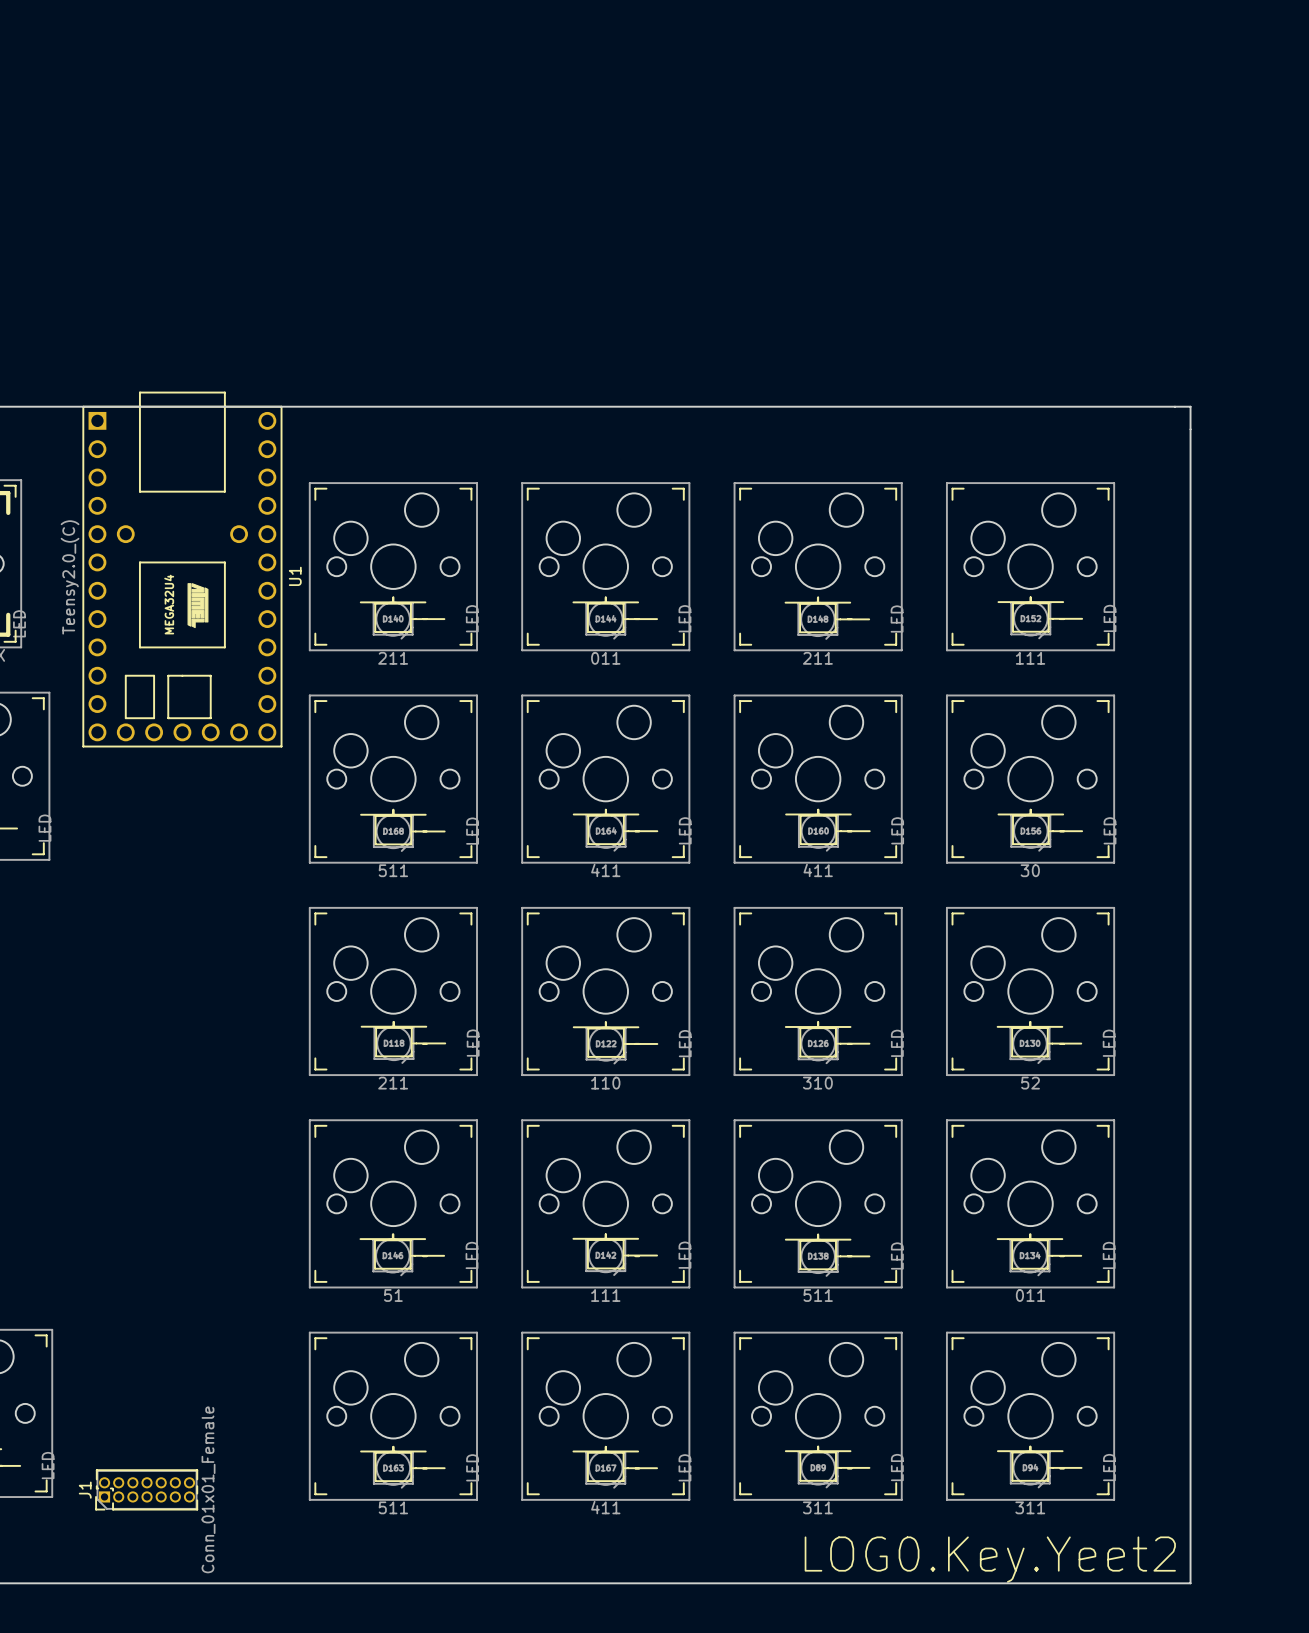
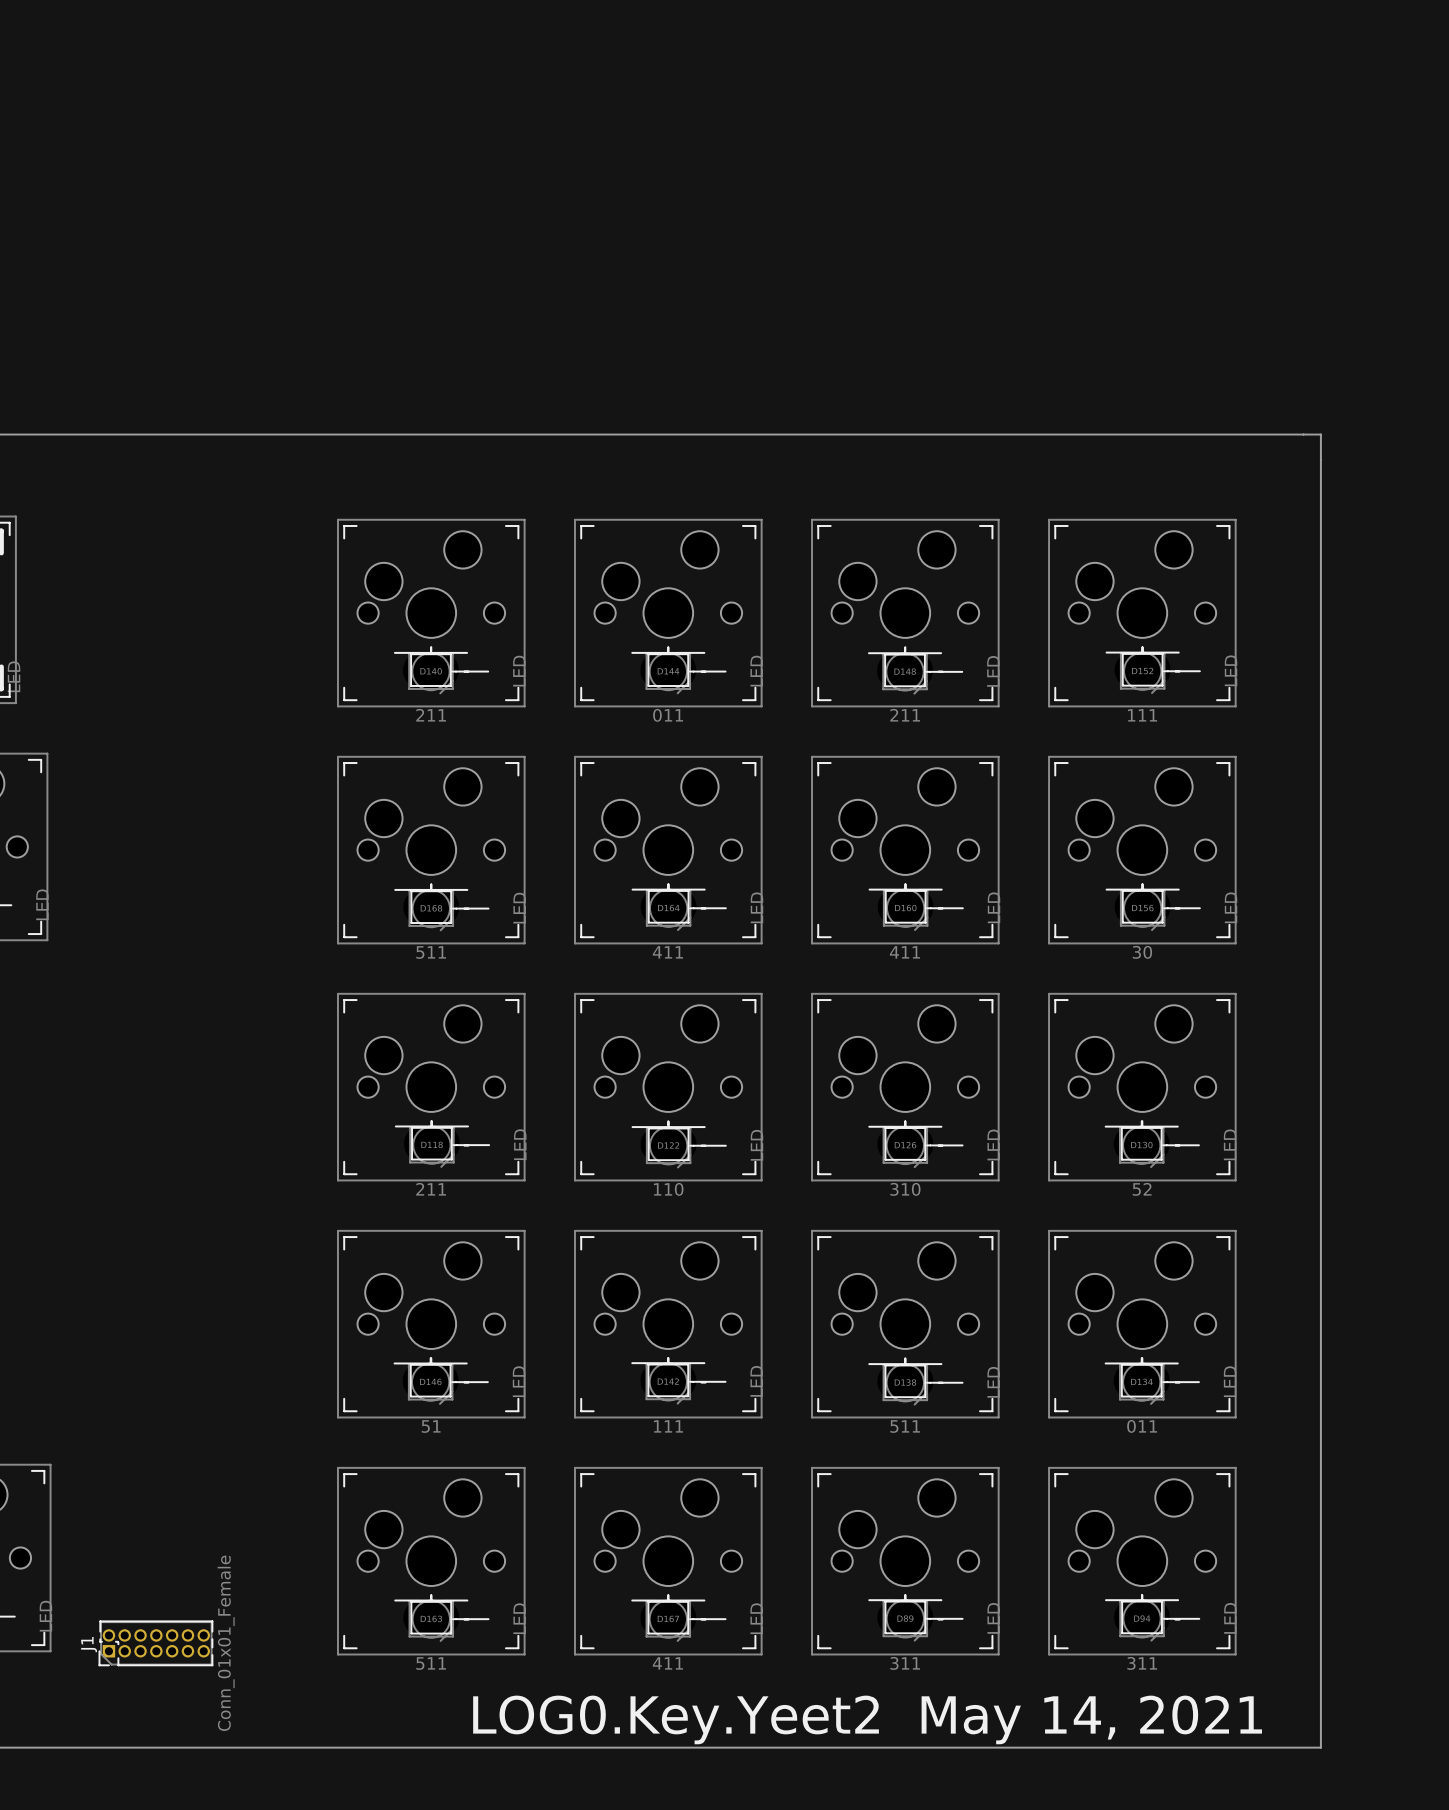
U1: Teensy2.0_(C) (182, 569) -> none
text: LOG0.Key.Yeet2 (990, 1559) -> LOG0.Key.Yeet2 May 14, 2021 (867, 1719)

